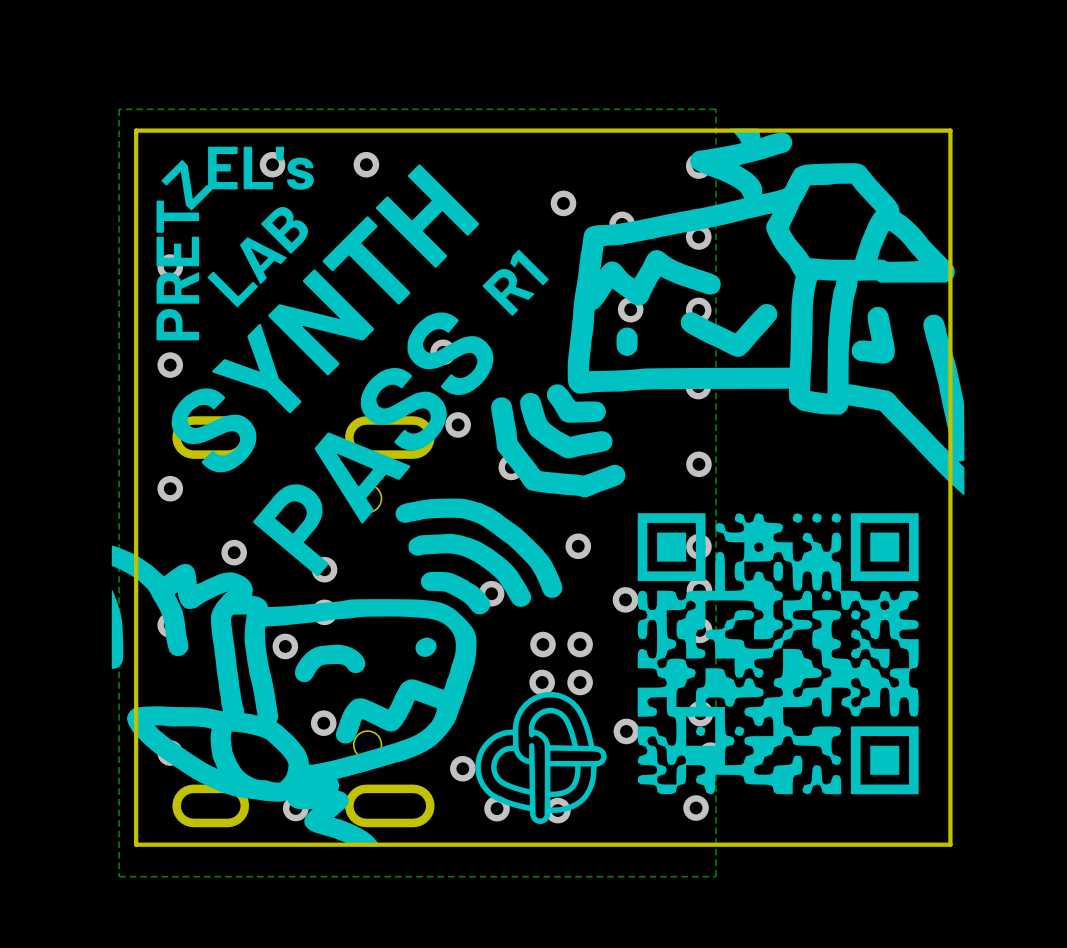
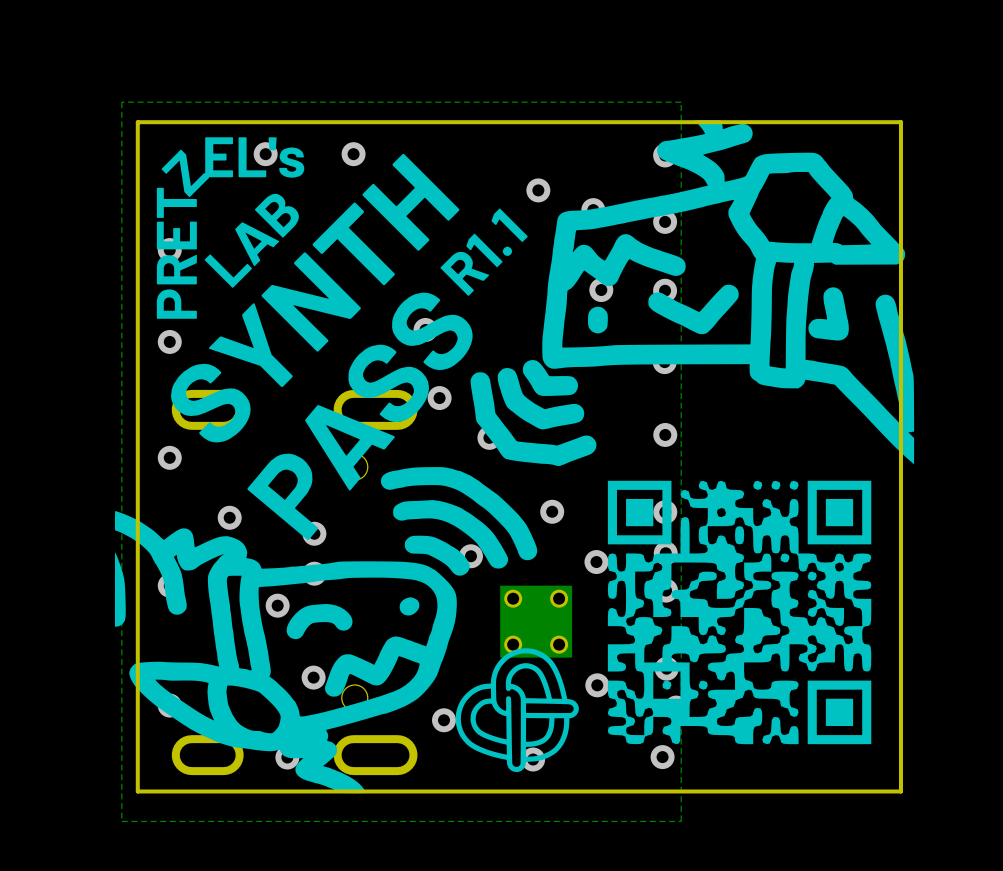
text: R1 (515, 282) -> R1.1 (484, 252)
via: (542, 644) -> none
via: (580, 644) -> none
part: none -> (536, 621)
via: (542, 682) -> none
via: (580, 682) -> none
via: (497, 808) -> none

